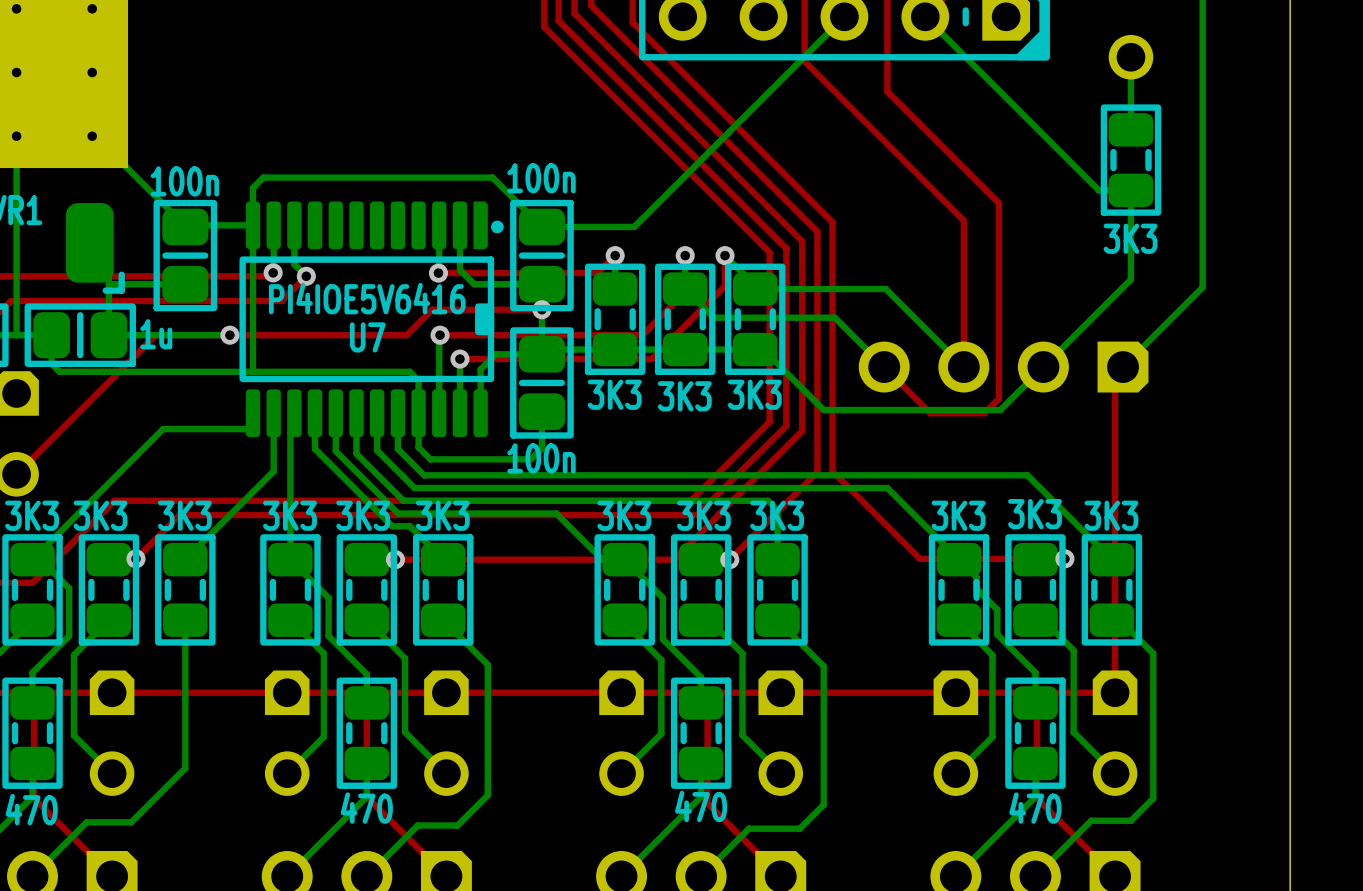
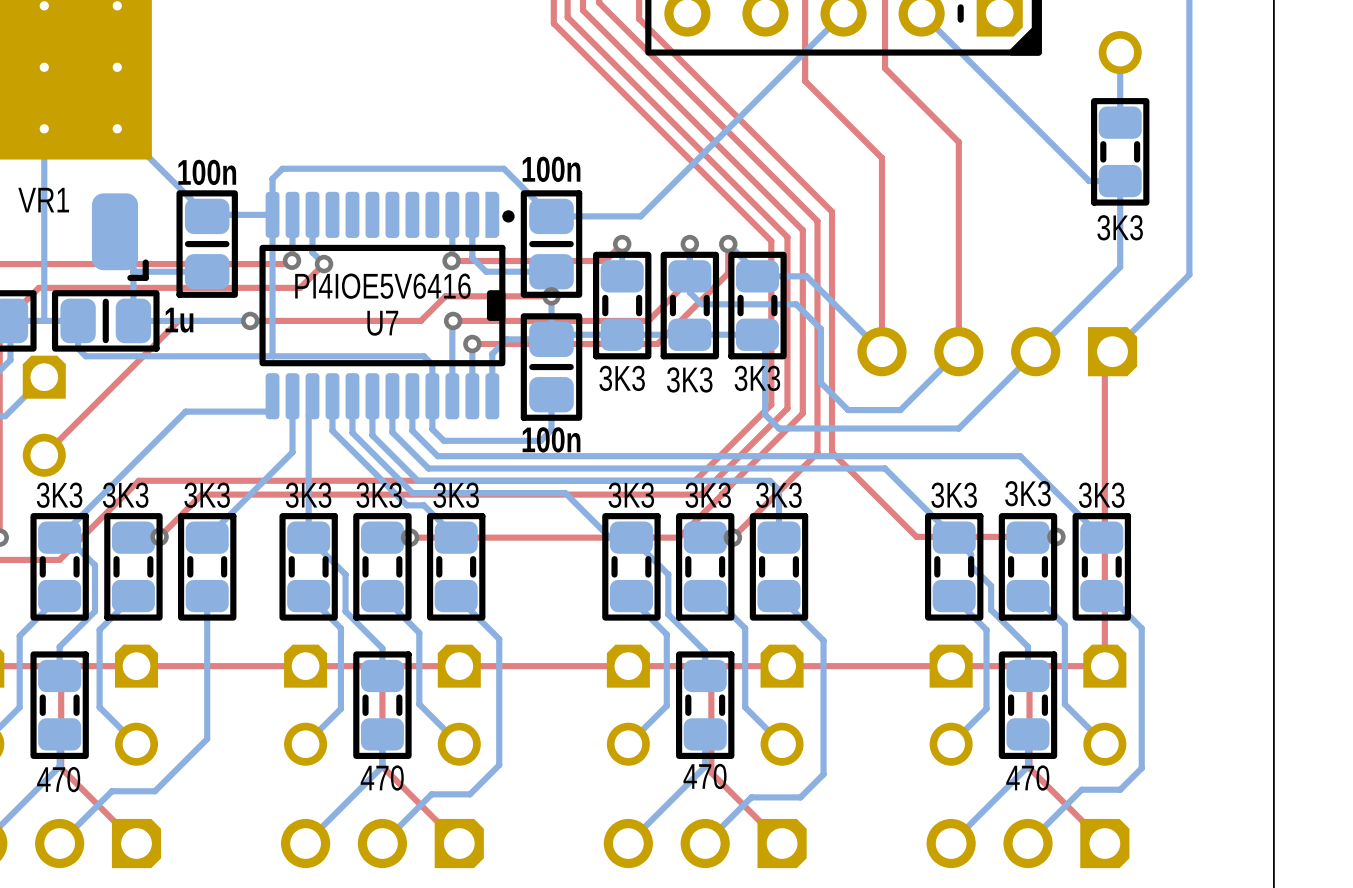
top track: (804, 61) (963, 220) -> (885, 68) (958, 142) (958, 210)
top track: (887, 73) (887, 91) (998, 203) (998, 398) (984, 413) (930, 413) (884, 367) -> (805, 56) (805, 81) (881, 158) (881, 351)
bottom track: (685, 289) (713, 317) (834, 317) -> (806, 276) (834, 304)
bottom track: (806, 289) (885, 289) (963, 367) -> (689, 276) (689, 292) (701, 304) (796, 304) (820, 329) (820, 382) (848, 410) (900, 410) (958, 351)
bottom track: (763, 349) (823, 410) (1000, 410) -> (765, 334) (765, 414) (778, 428) (958, 428) (994, 393)

